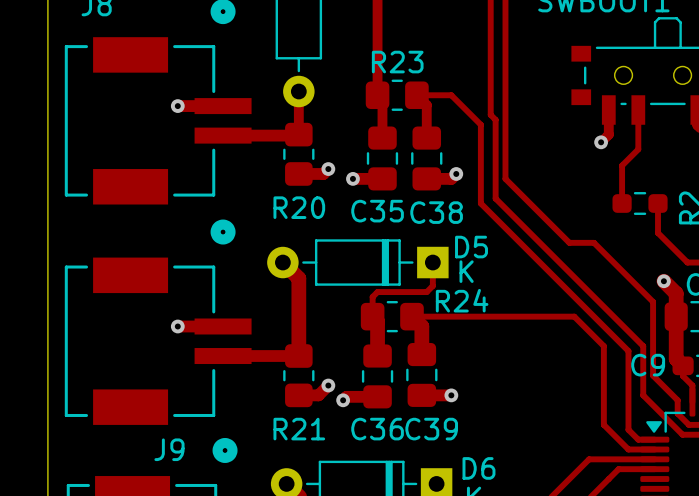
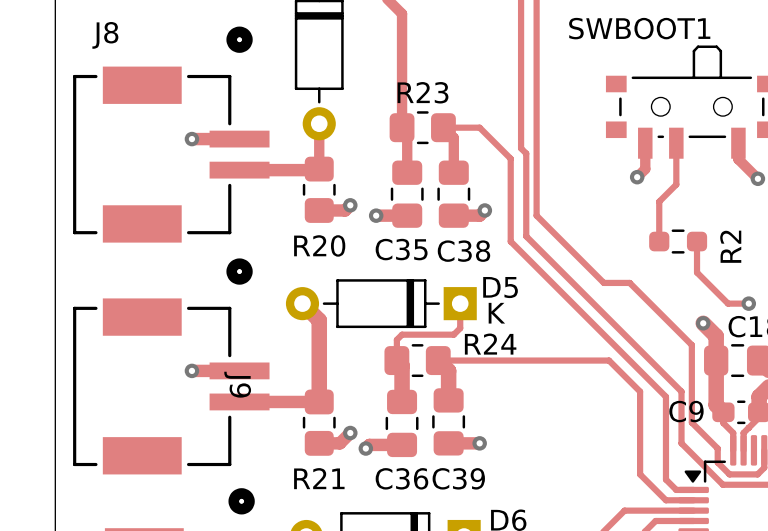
J9 name rotation: 0° (169, 449) -> 90° clockwise (237, 384)
J9 name position: J9 (169, 449) -> J9 (237, 384)

